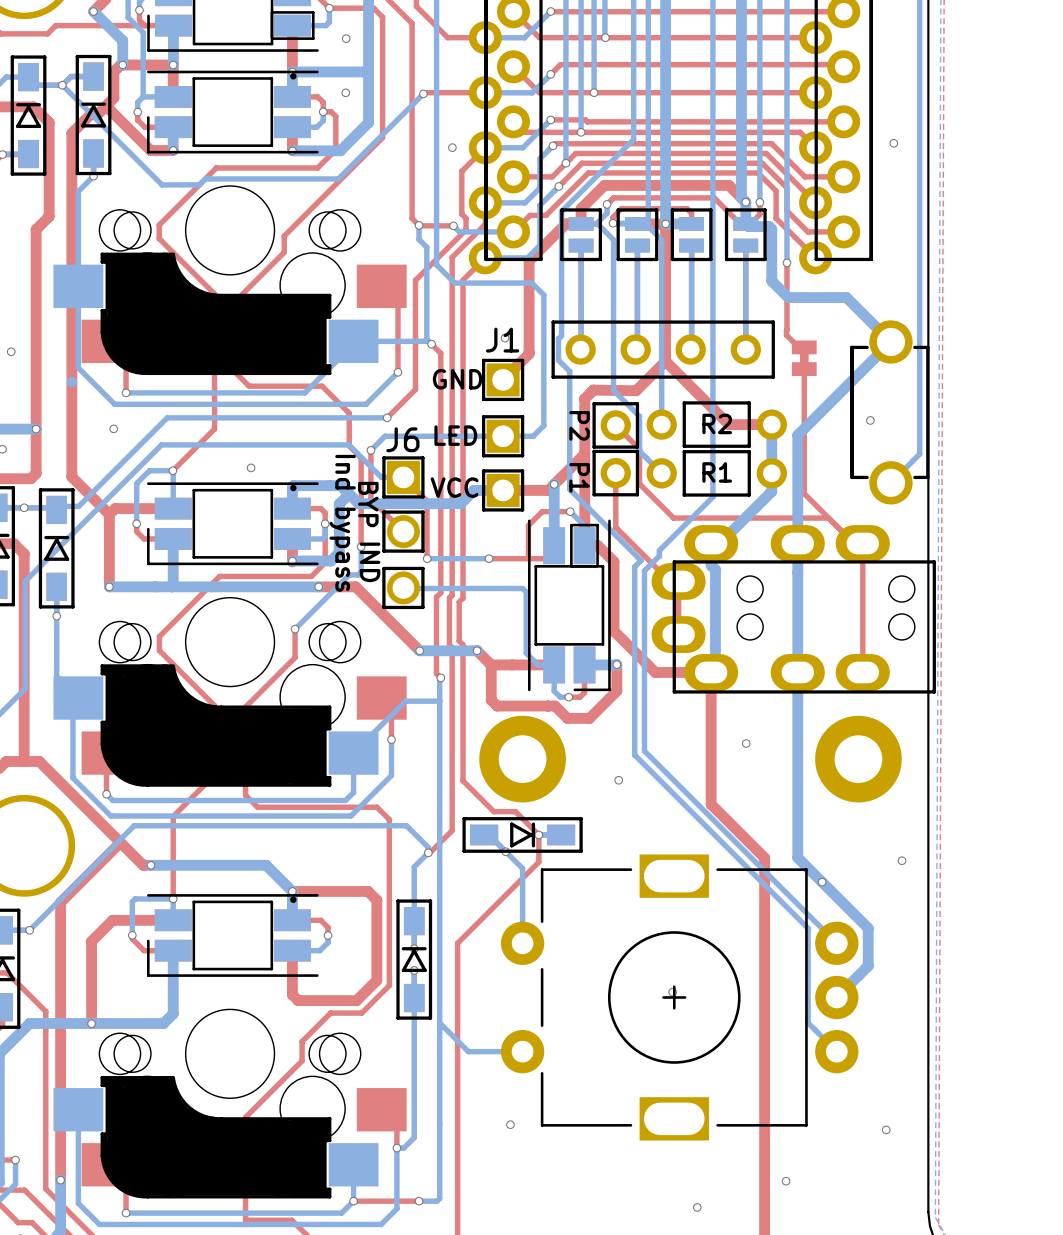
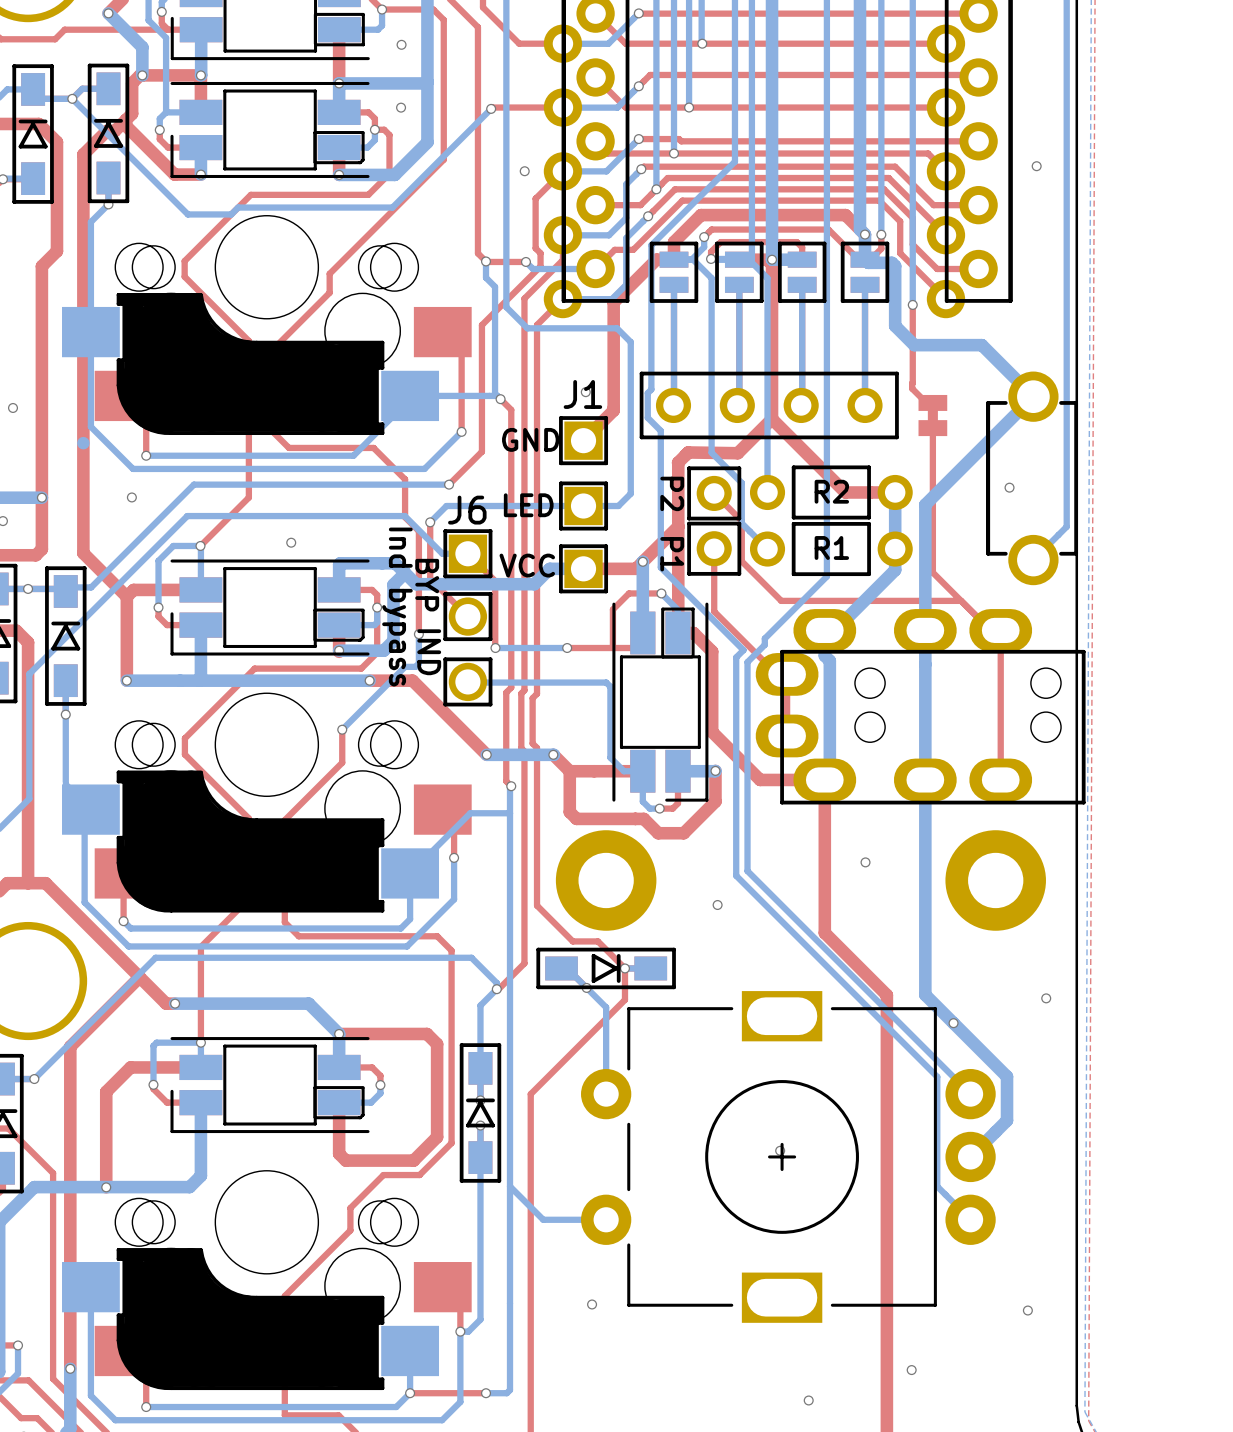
part footprint: [53, 70, 407, 376] -> [62, 81, 472, 436]
part footprint: [53, 482, 407, 787] -> [62, 559, 472, 913]
part footprint: [53, 894, 407, 1199] -> [62, 1037, 472, 1391]

